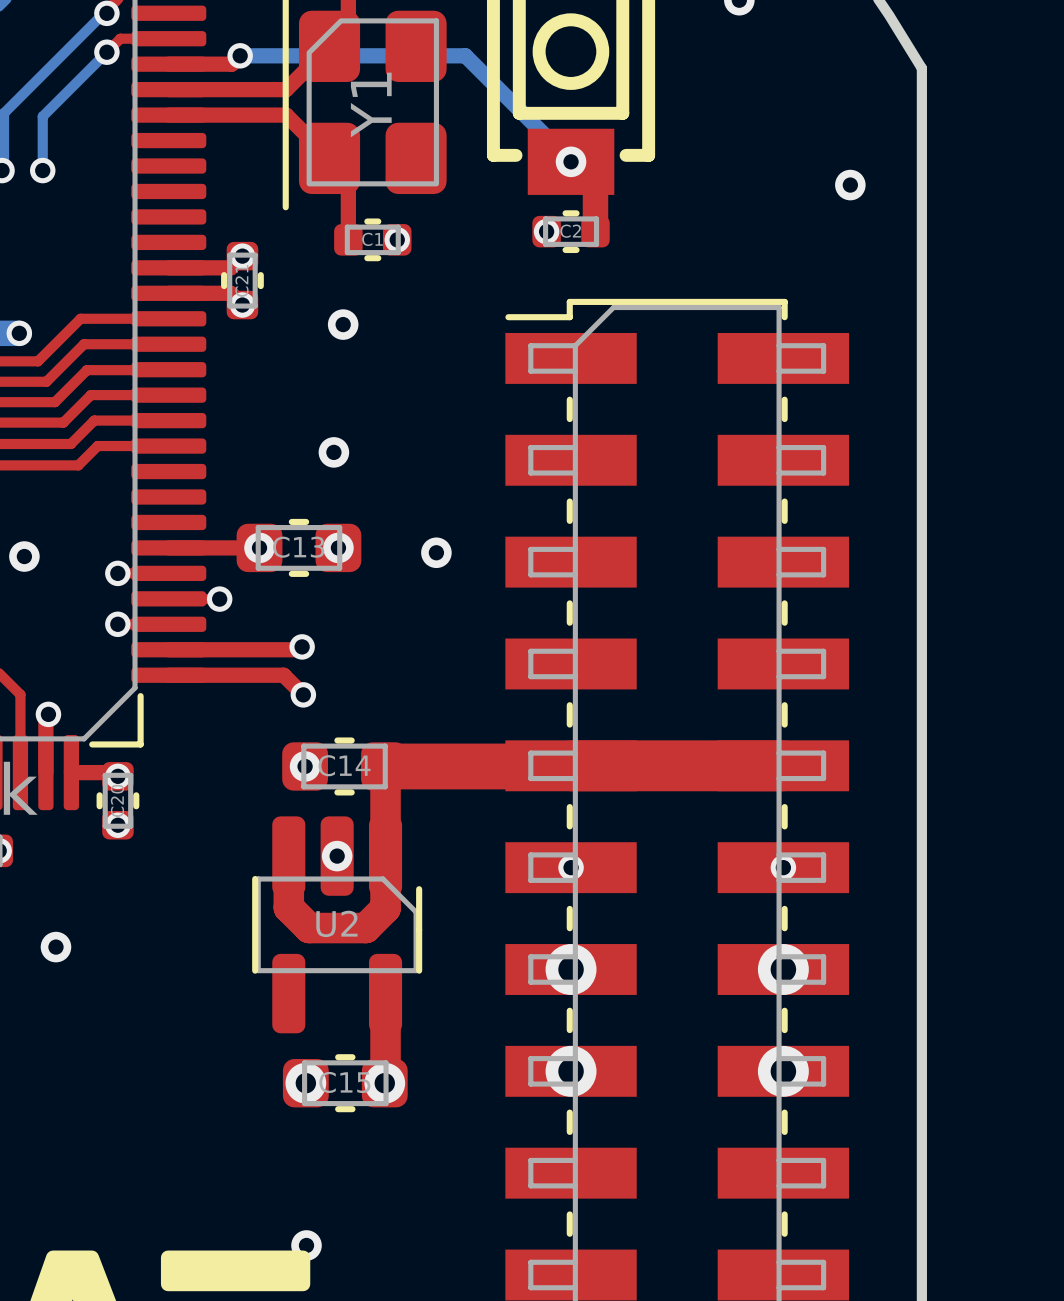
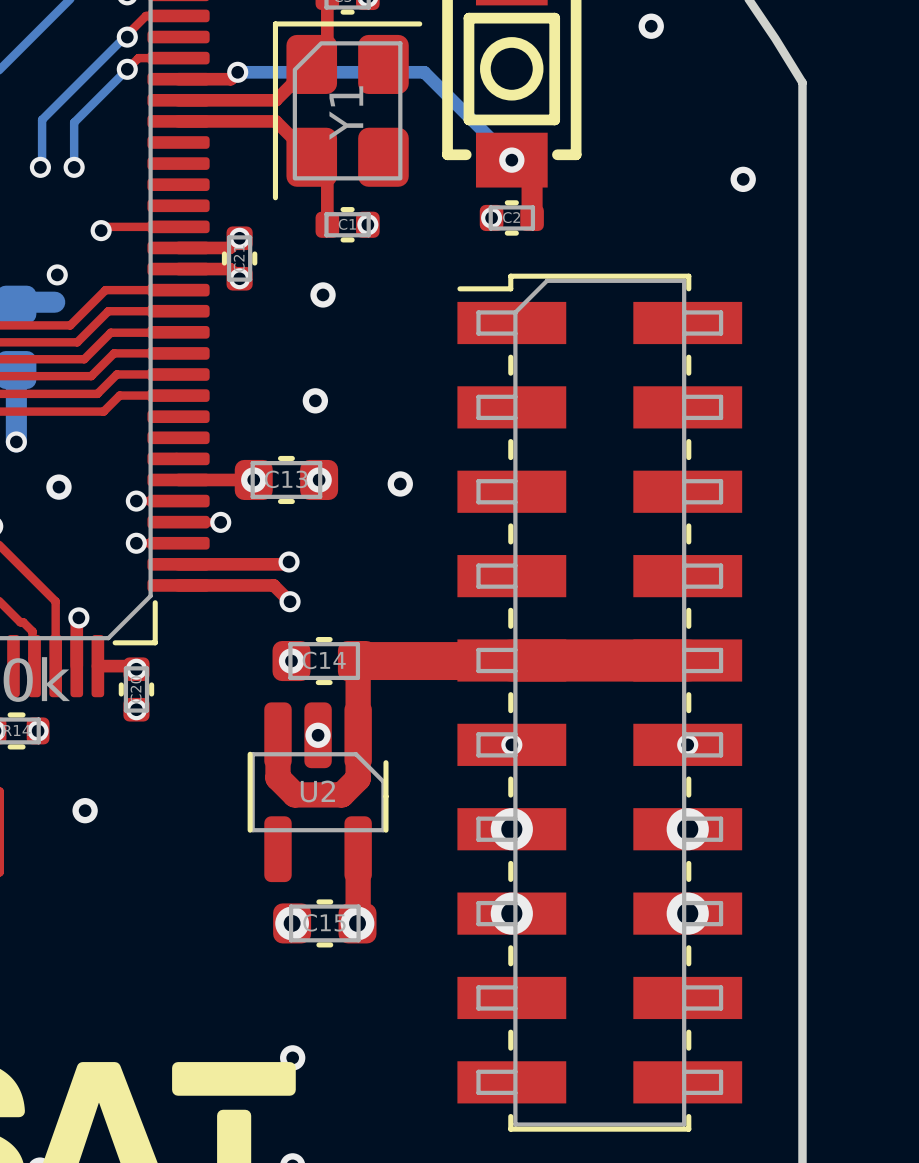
top track: none -> (178, 226) (104, 226) (101, 230)
via: none -> (101, 230)
via position: (19, 333) -> (57, 274)

